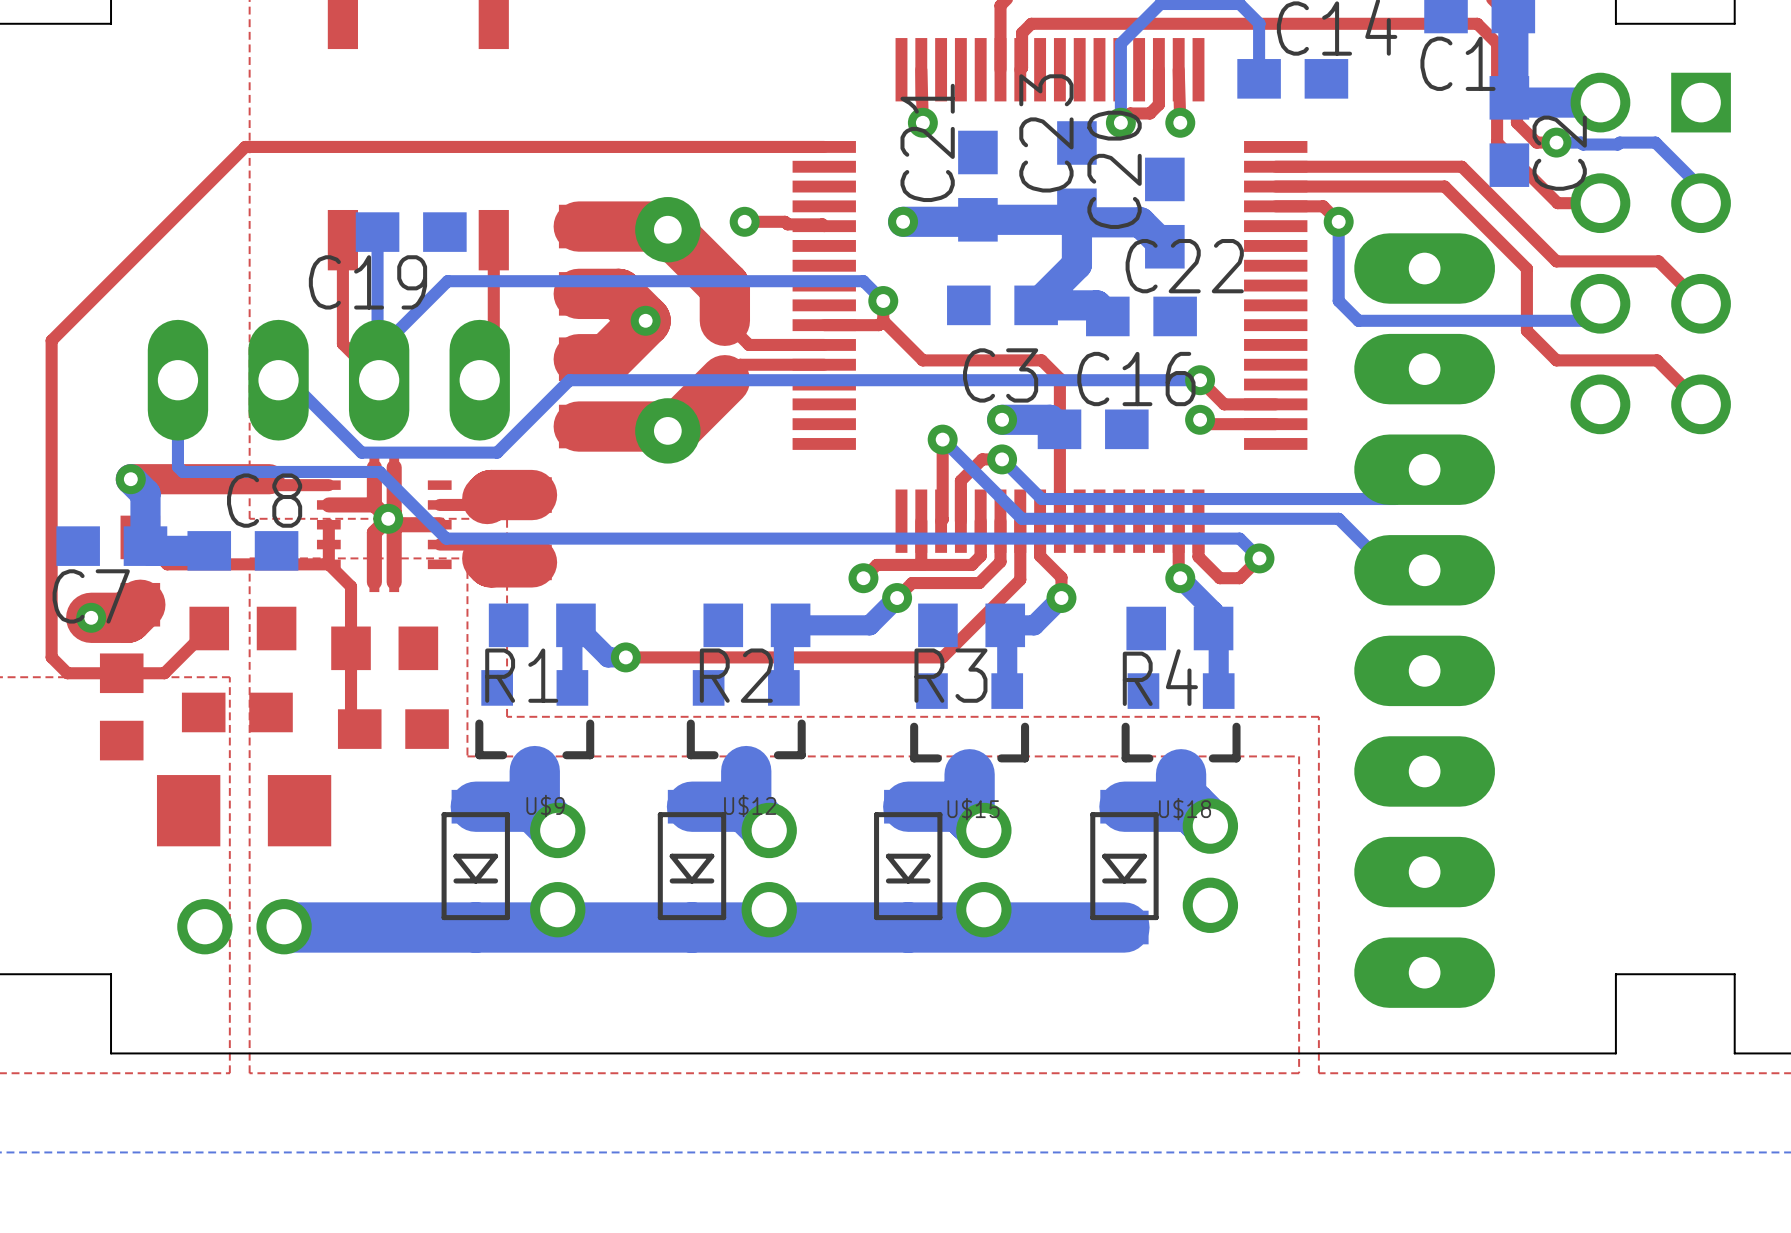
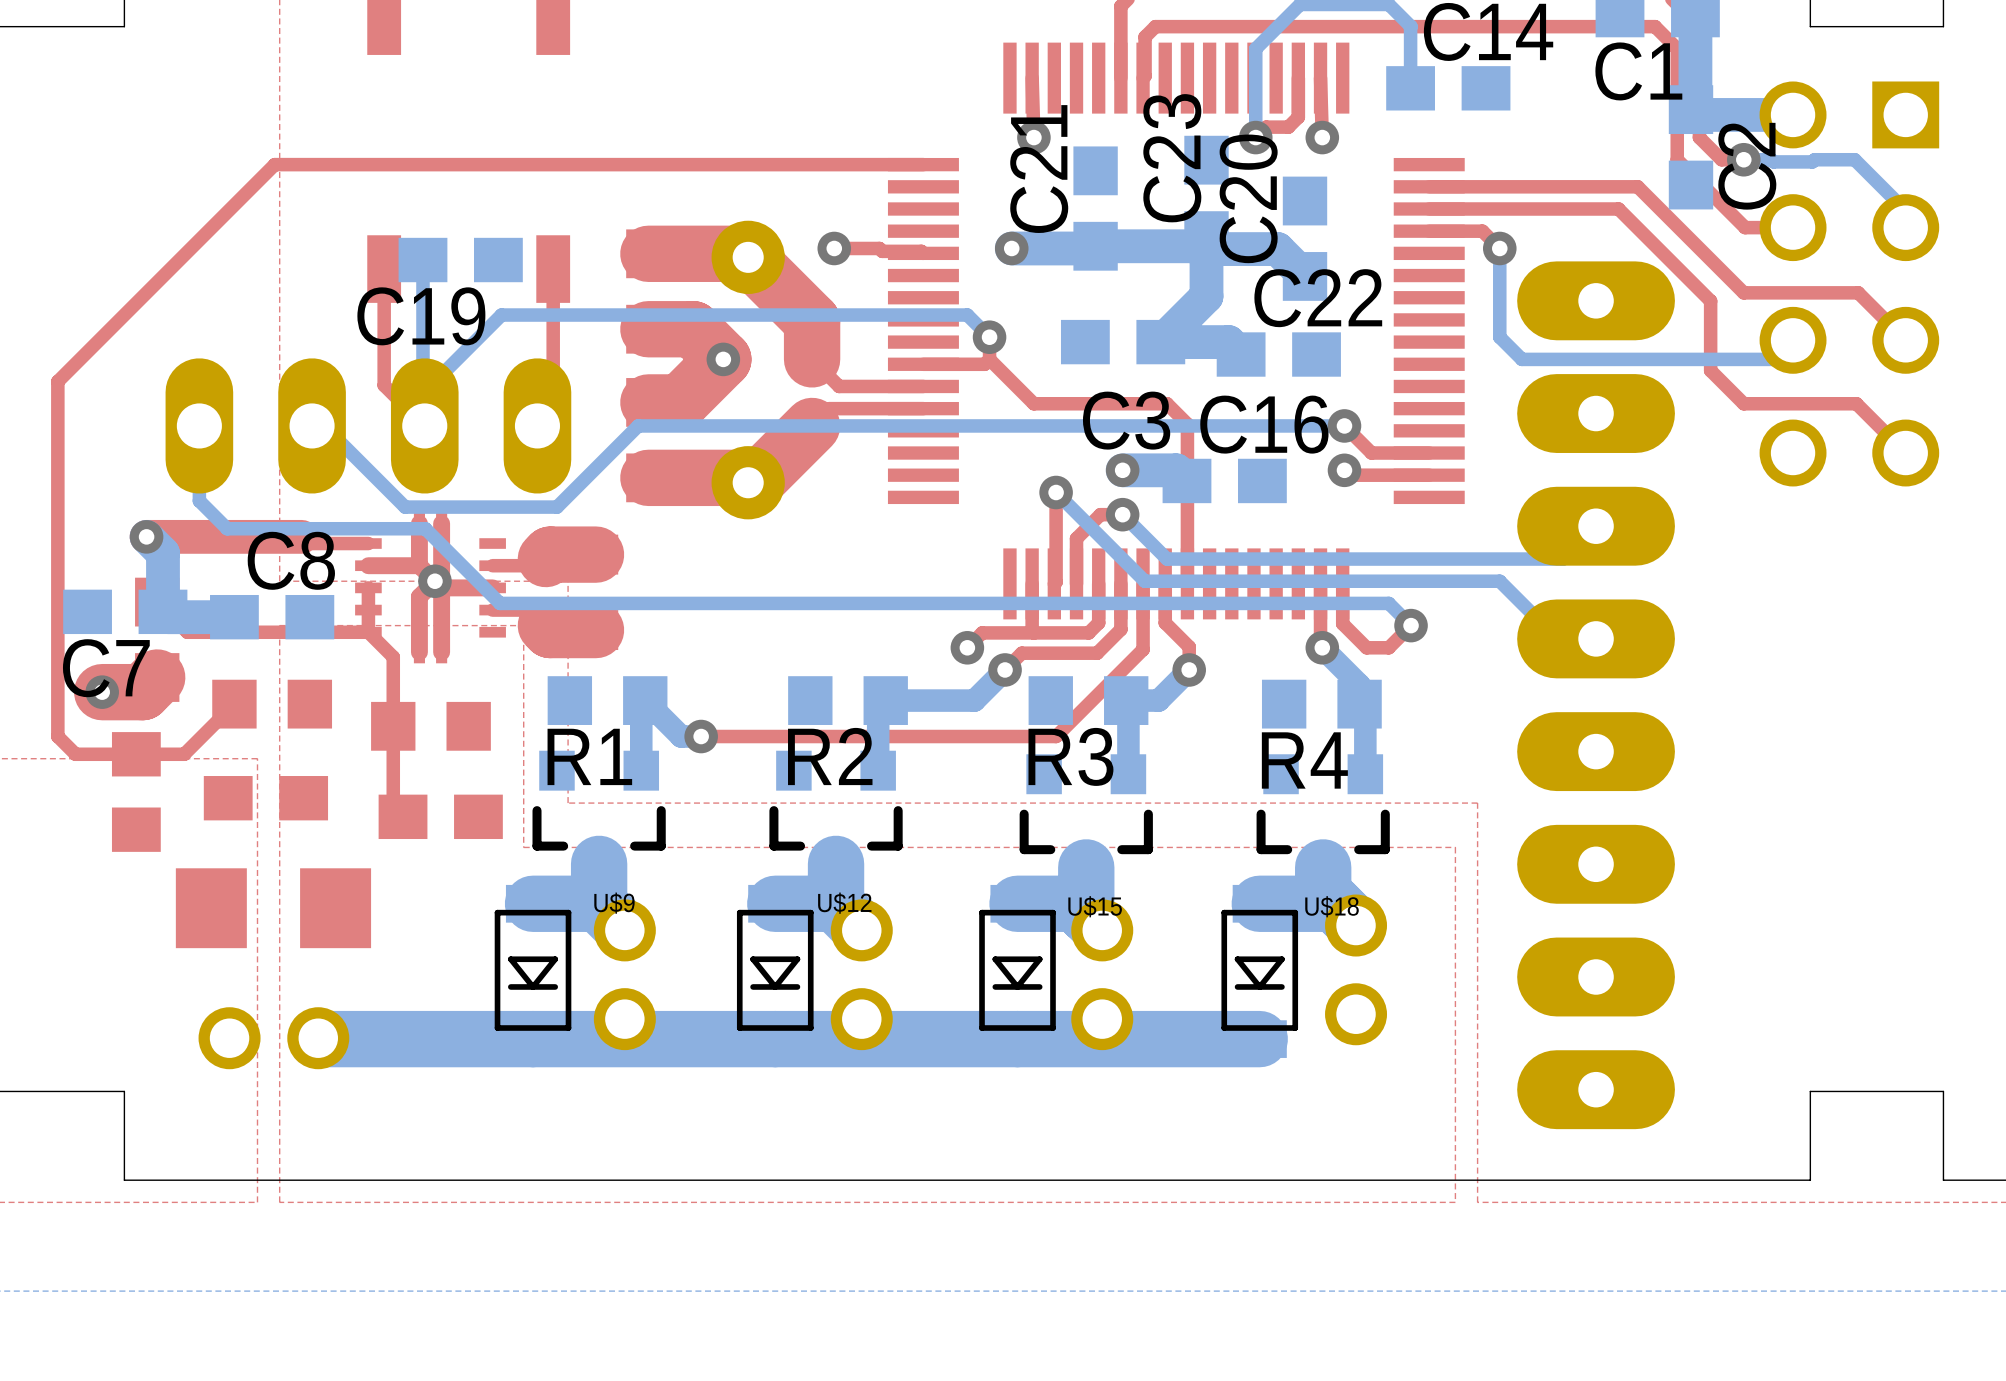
bottom track: (177, 447) (177, 466) (182, 471) (202, 471) -> (199, 500) (227, 528)

